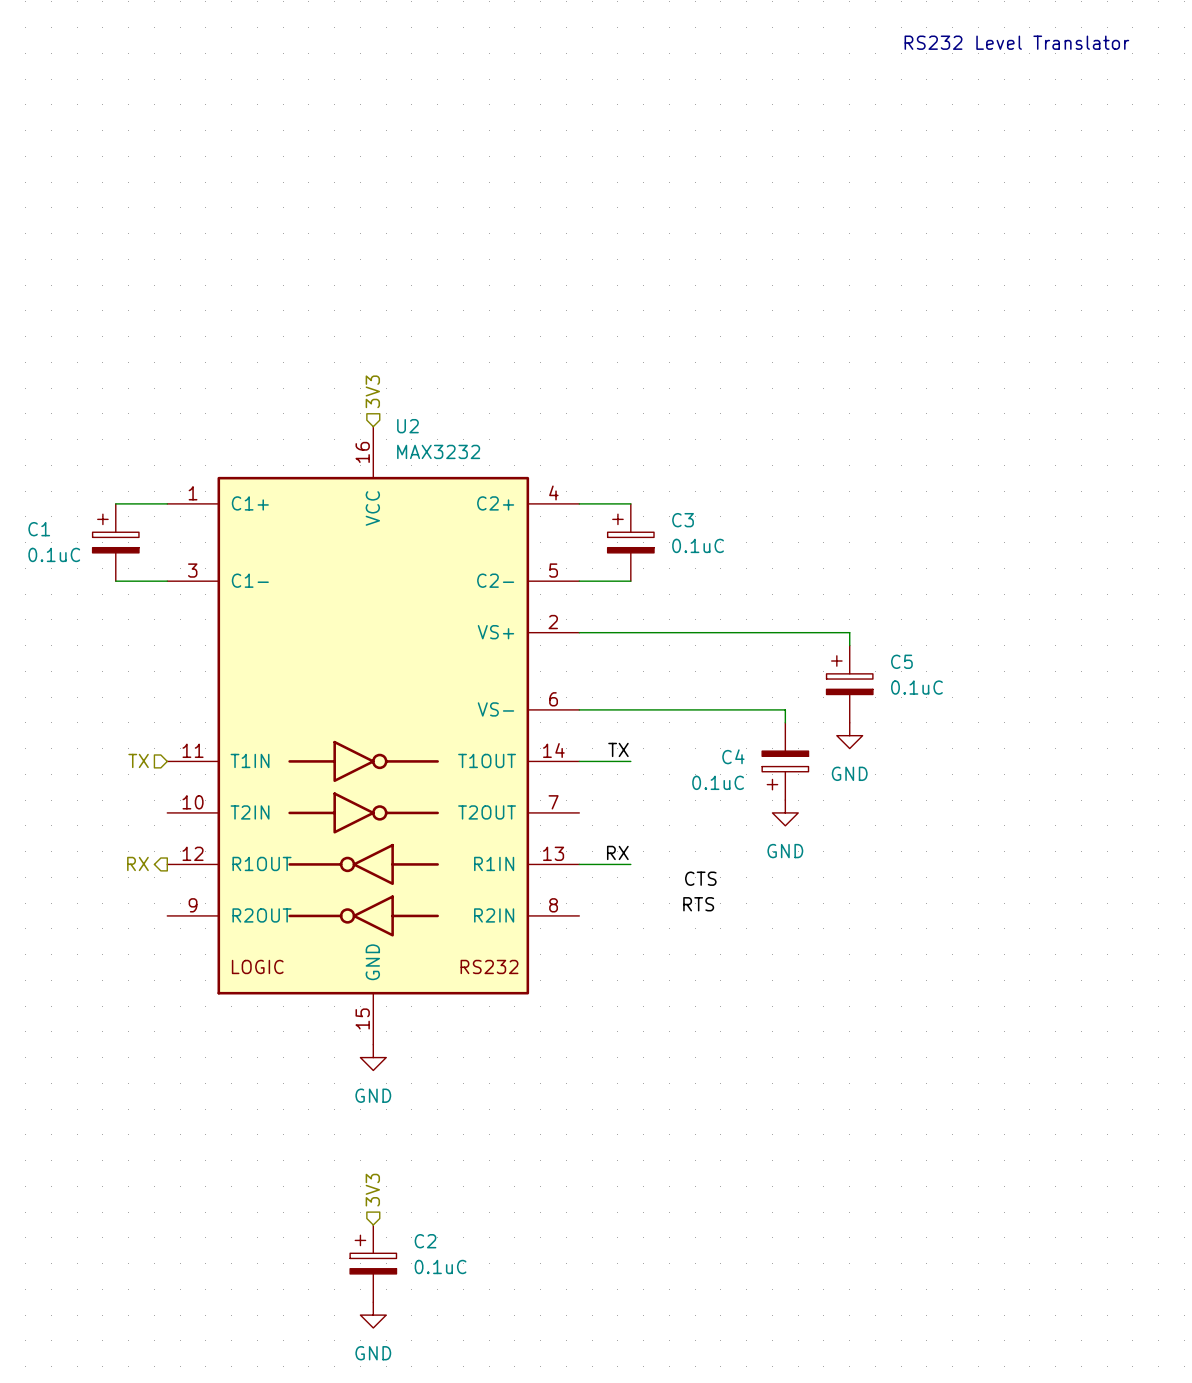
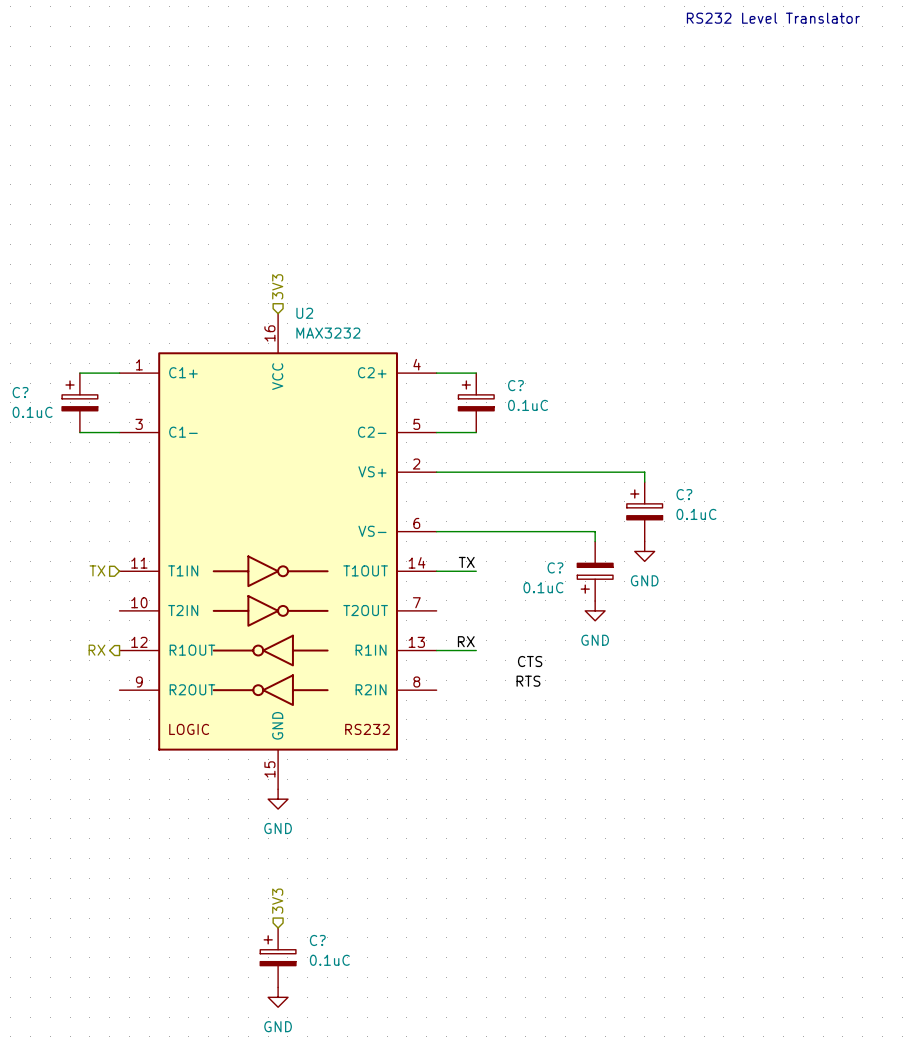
C3 name: C3 (683, 520) -> C? (515, 385)
C1 name: C1 (39, 529) -> C? (20, 392)
C5 name: C5 (901, 661) -> C? (684, 494)
C4 name: C4 (733, 756) -> C? (555, 567)
C2 name: C2 (425, 1241) -> C? (317, 940)

